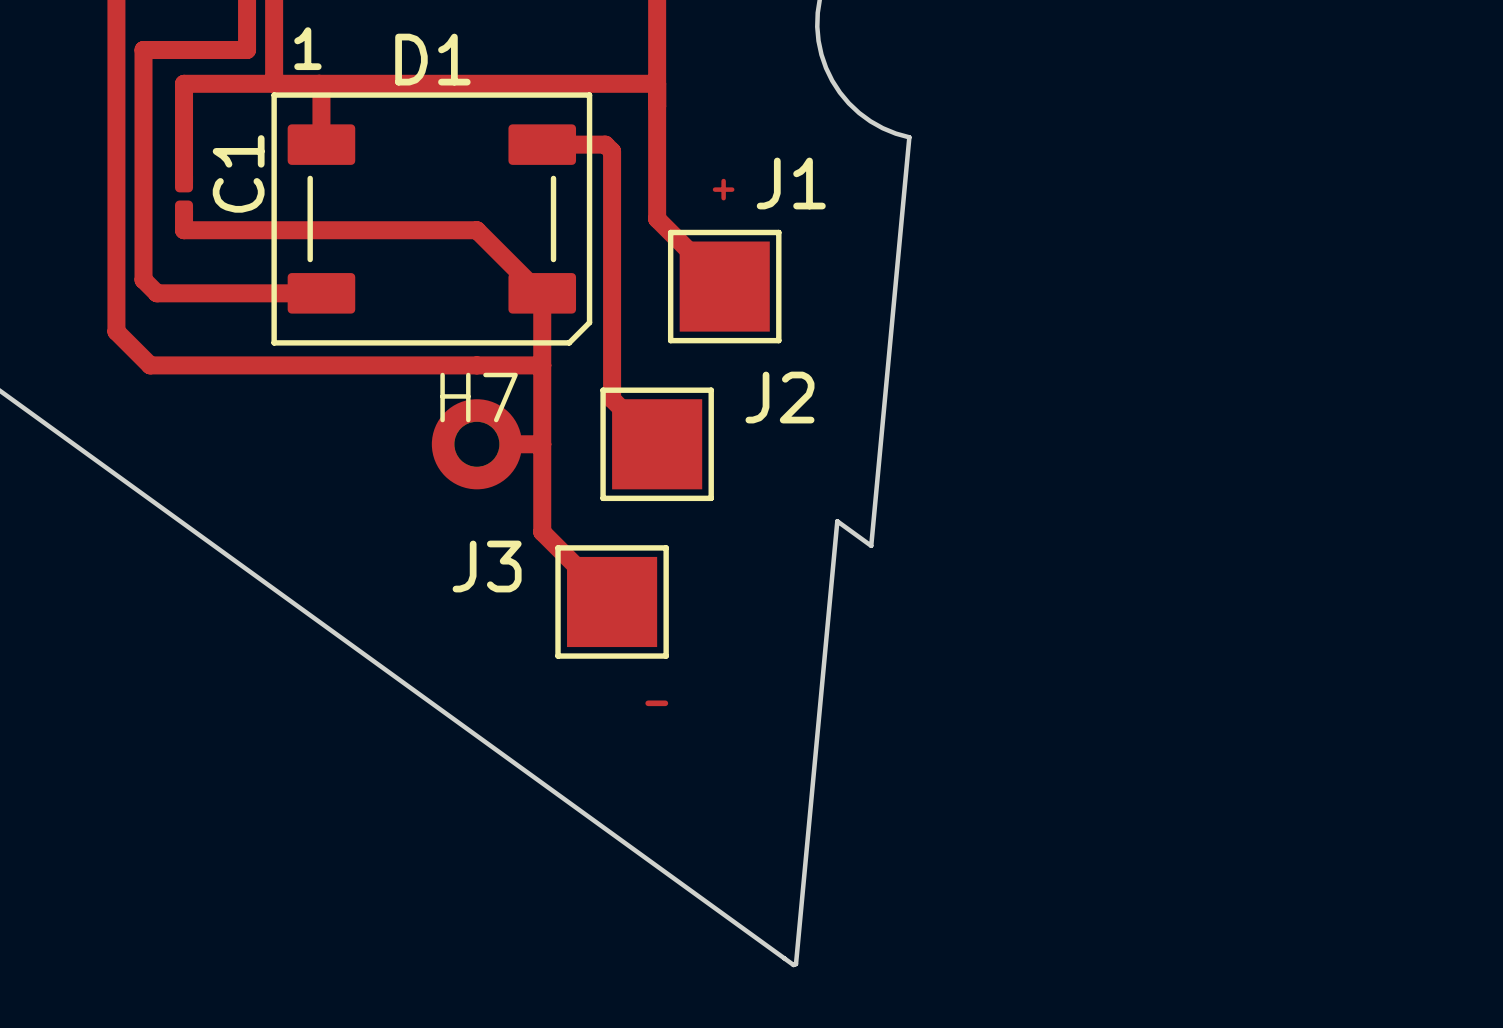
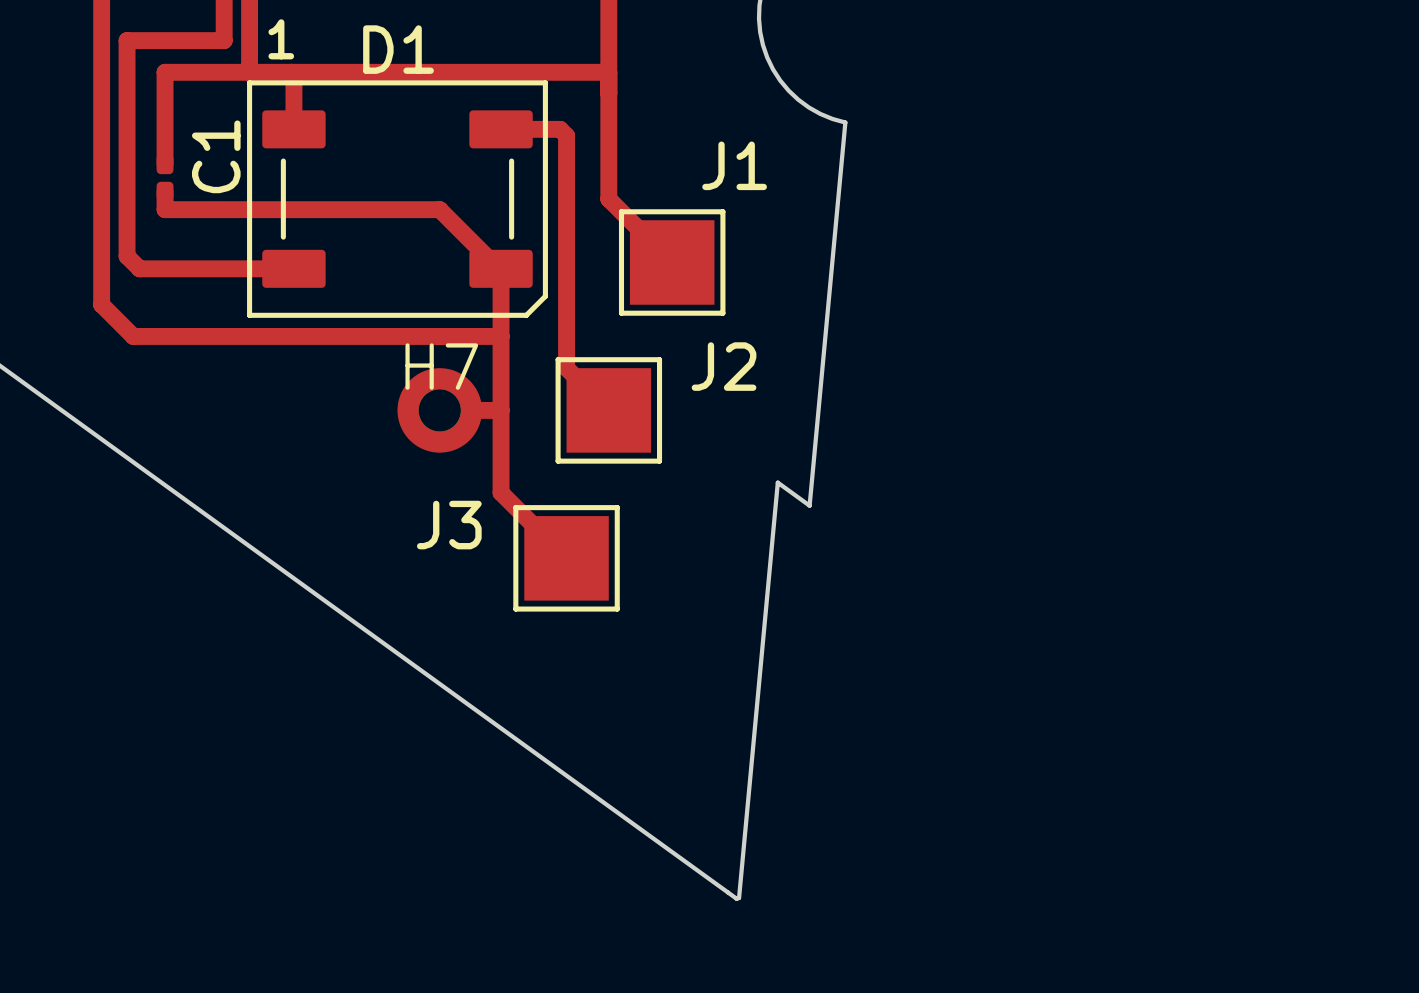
text: + (723, 189) -> none
text: - (656, 703) -> none

